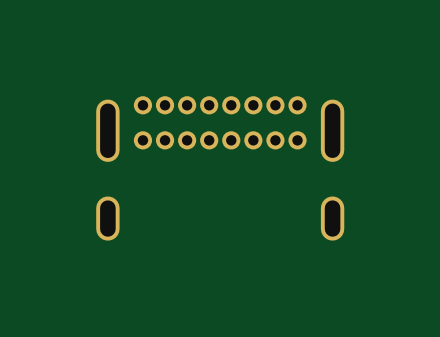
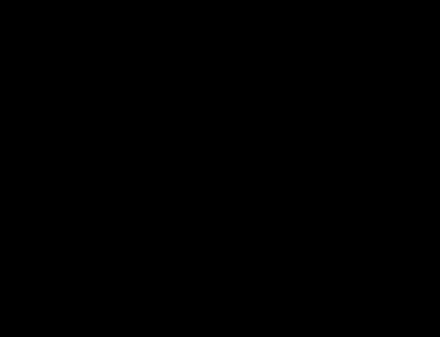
part: (220, 168) -> none

